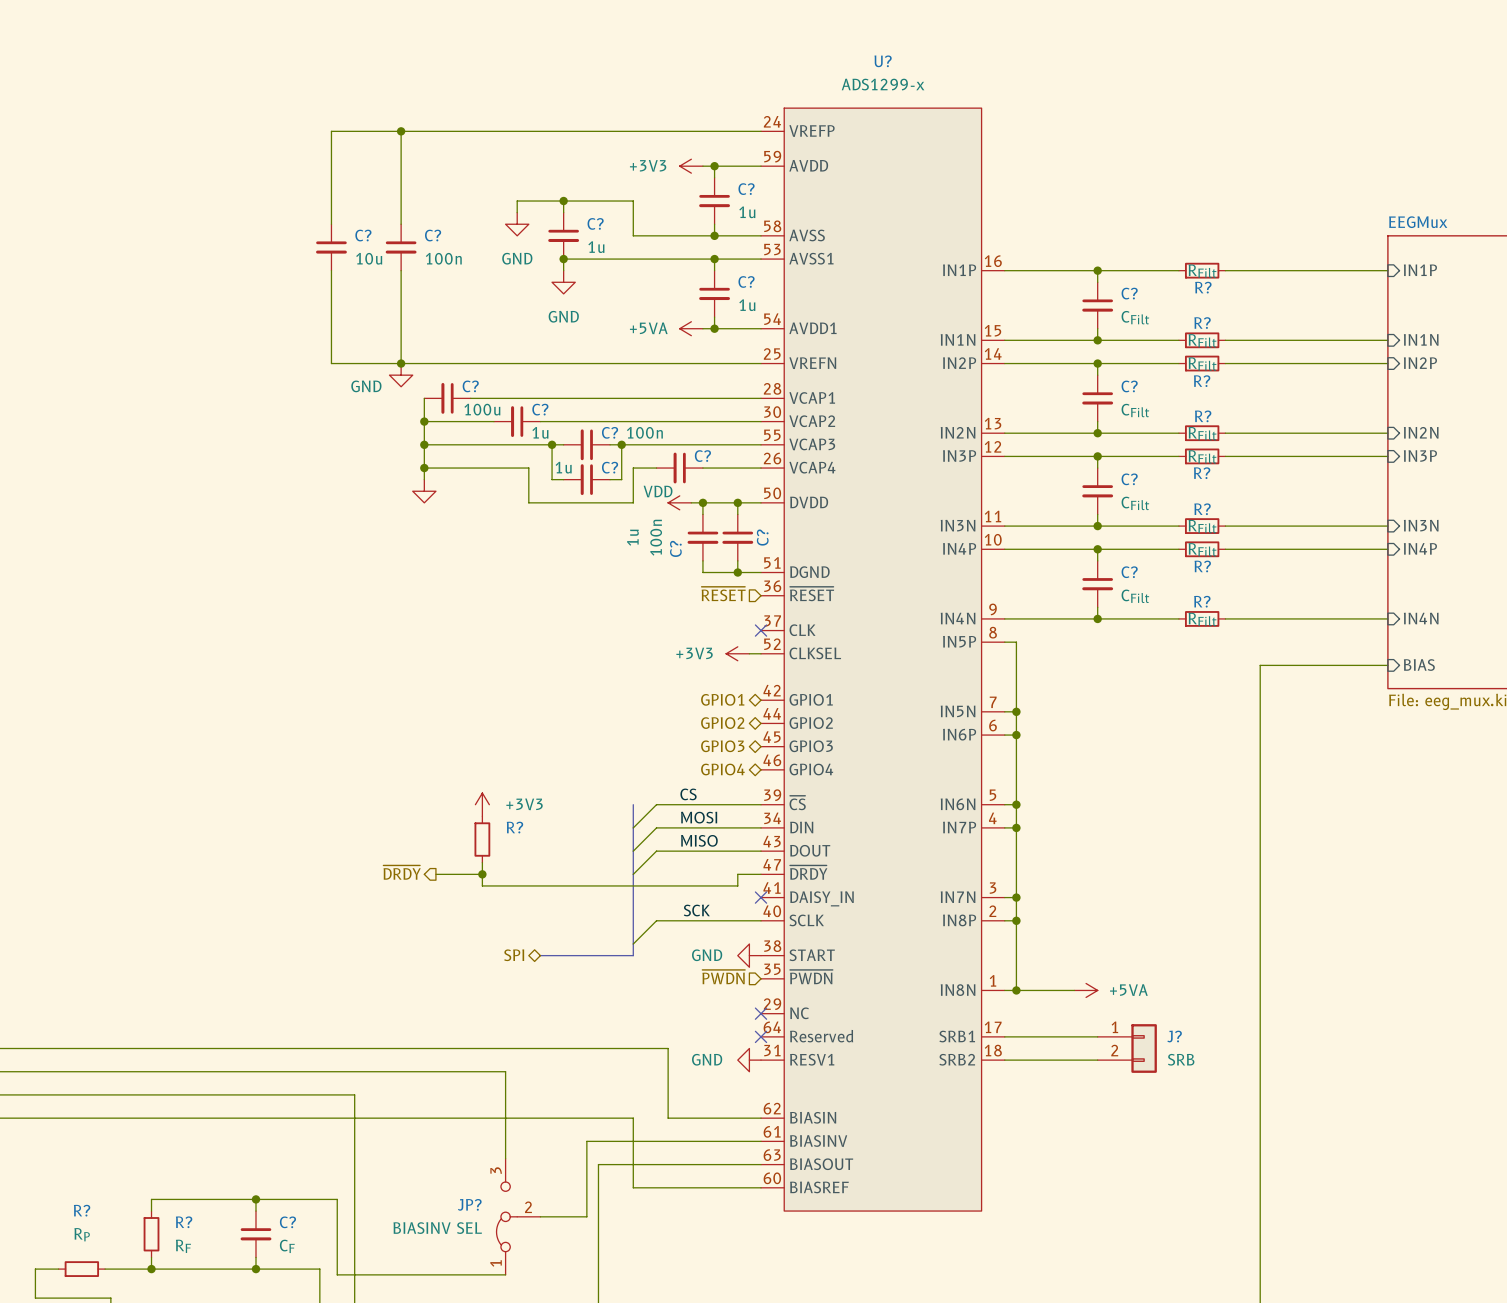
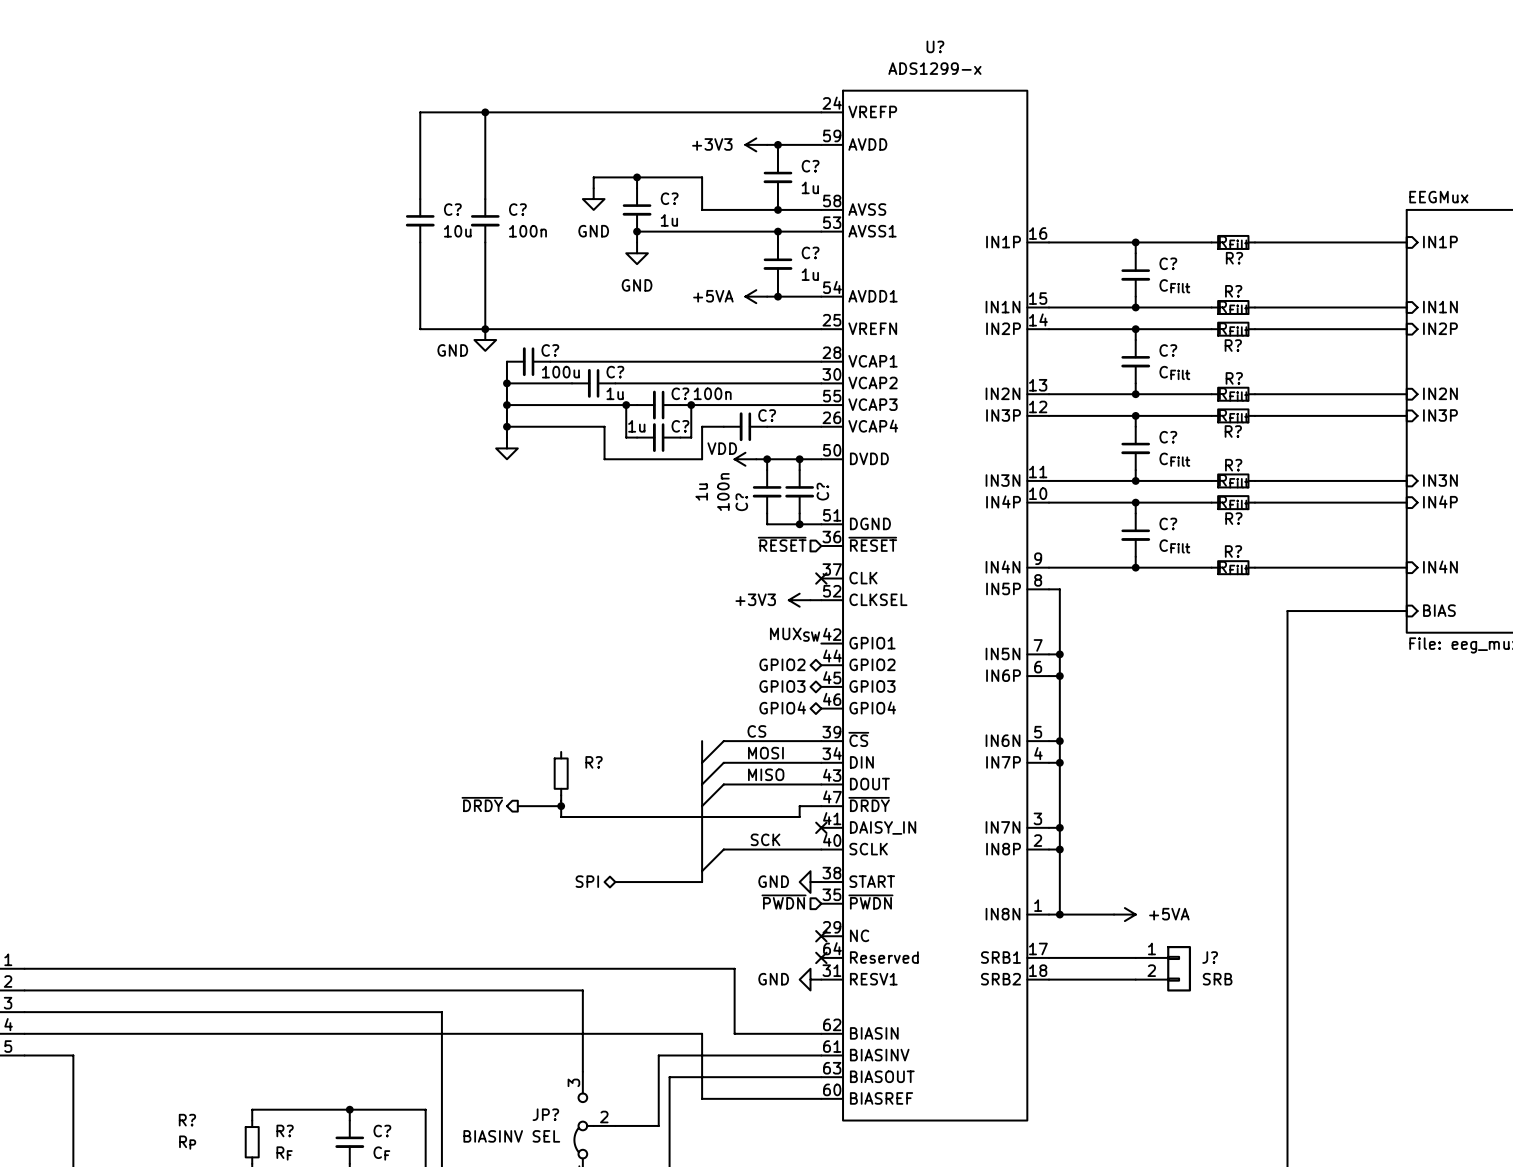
label: none -> MUXSW (795, 634)
hierarchical label: GPIO1 (722, 699) -> none
power symbol: +3V3 (482, 804) -> none

